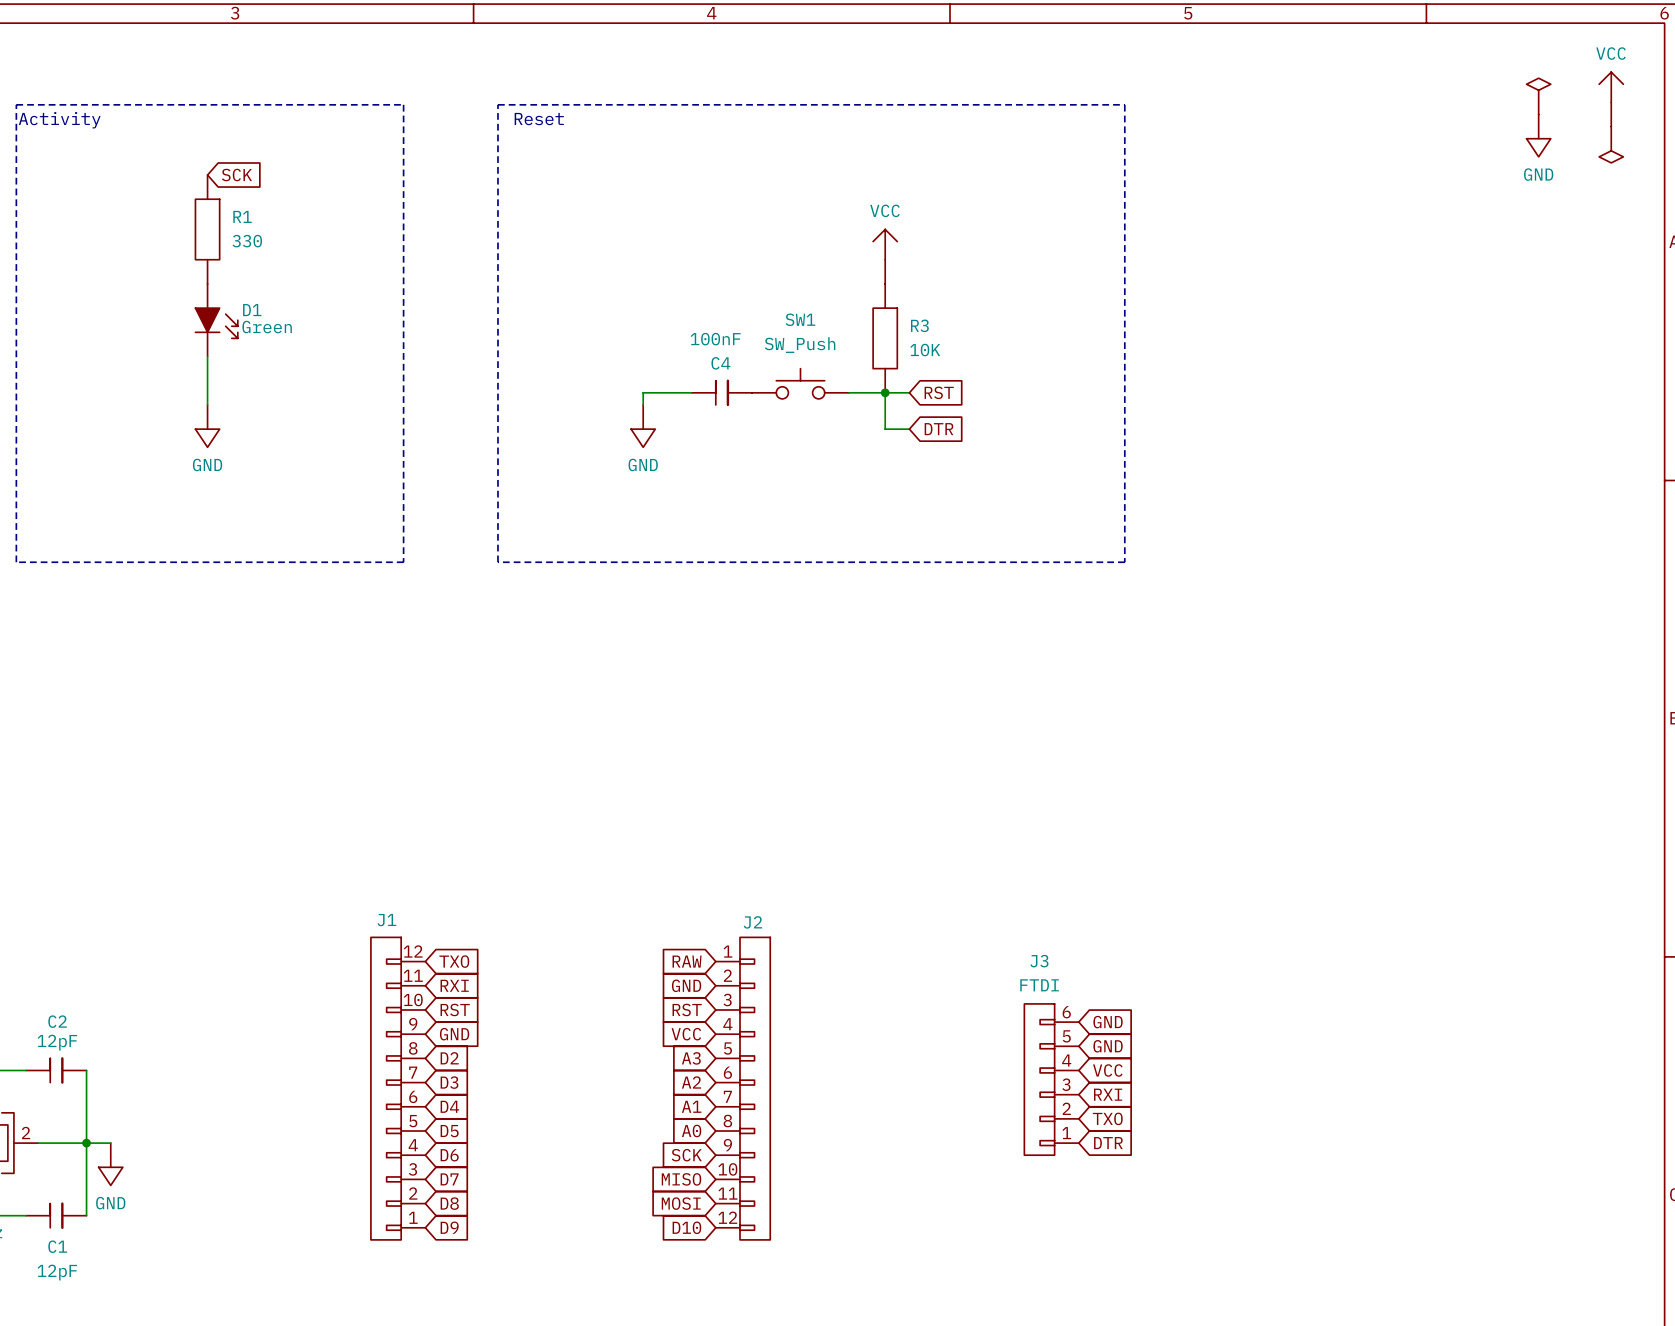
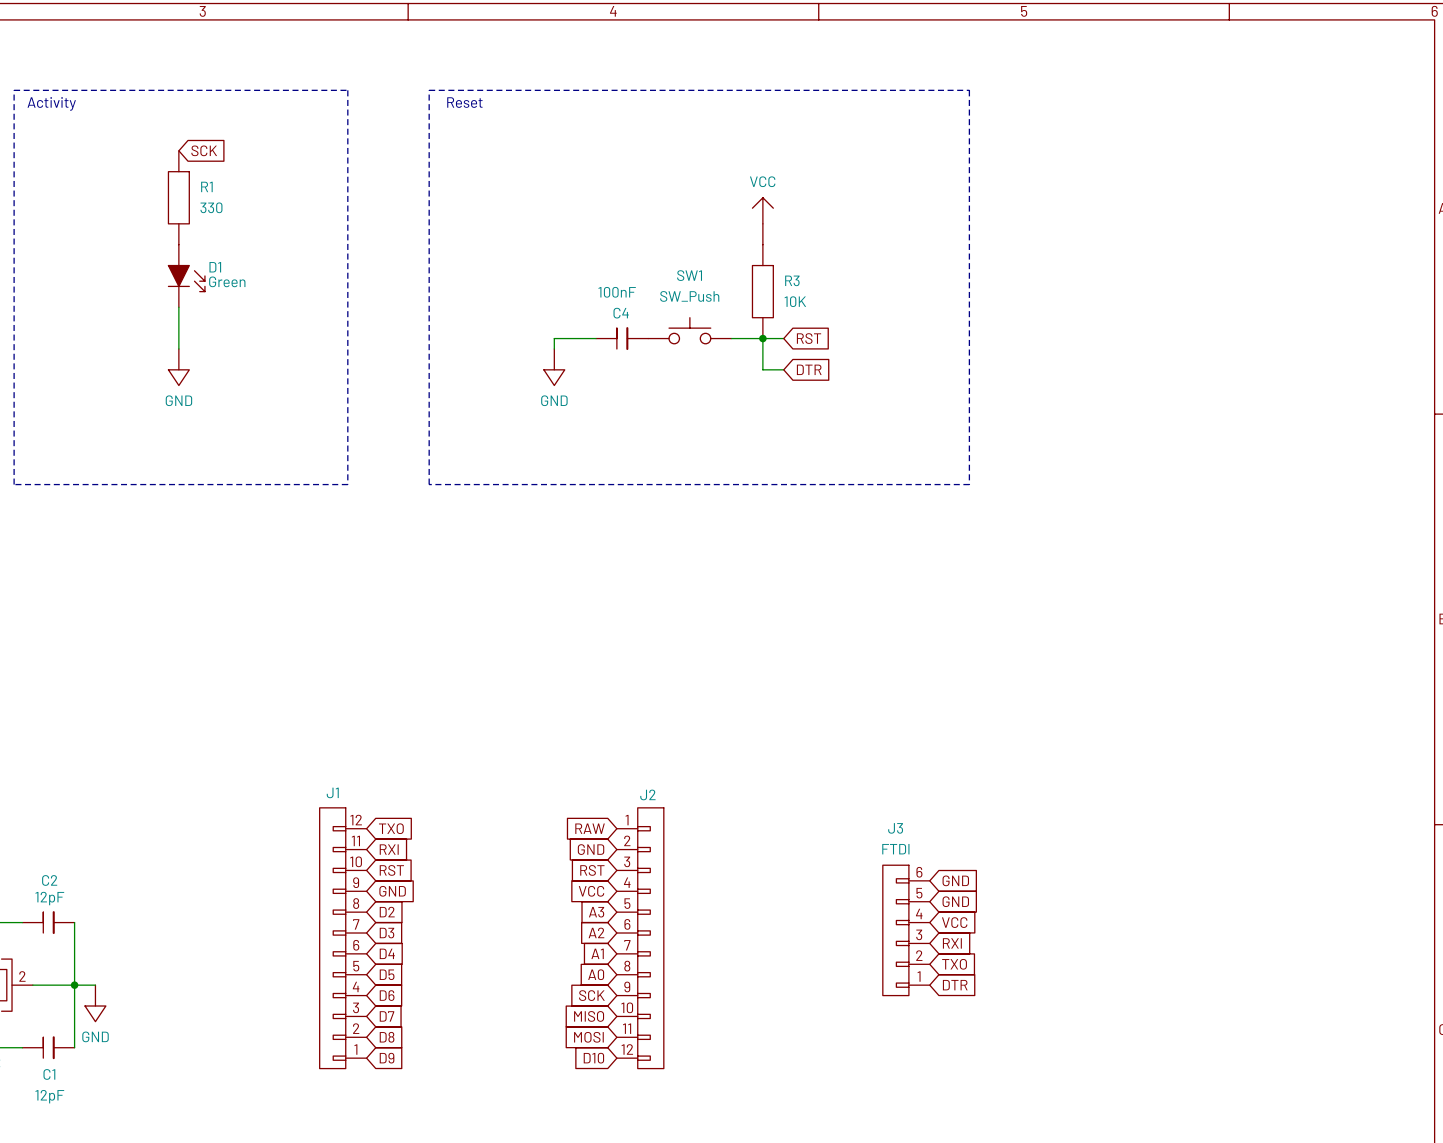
part: (1538, 96) -> none
power symbol: VCC (1611, 99) -> none
power symbol: GND (1538, 135) -> none
part: (1611, 144) -> none

